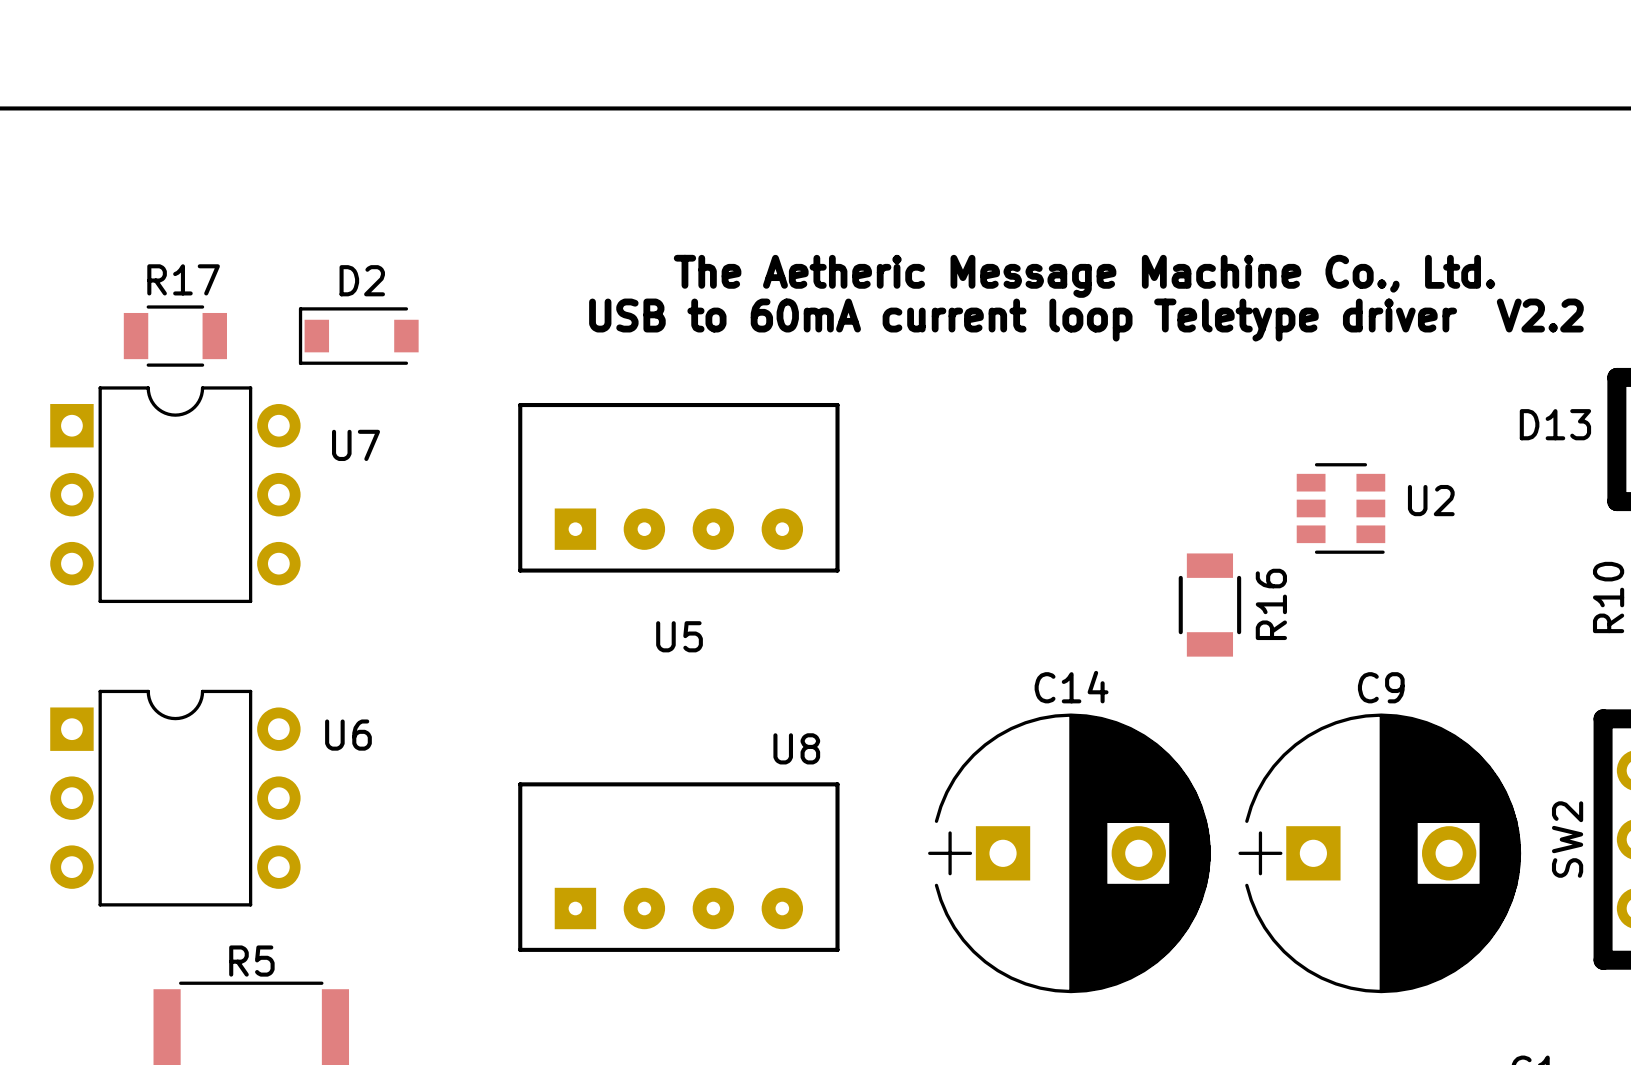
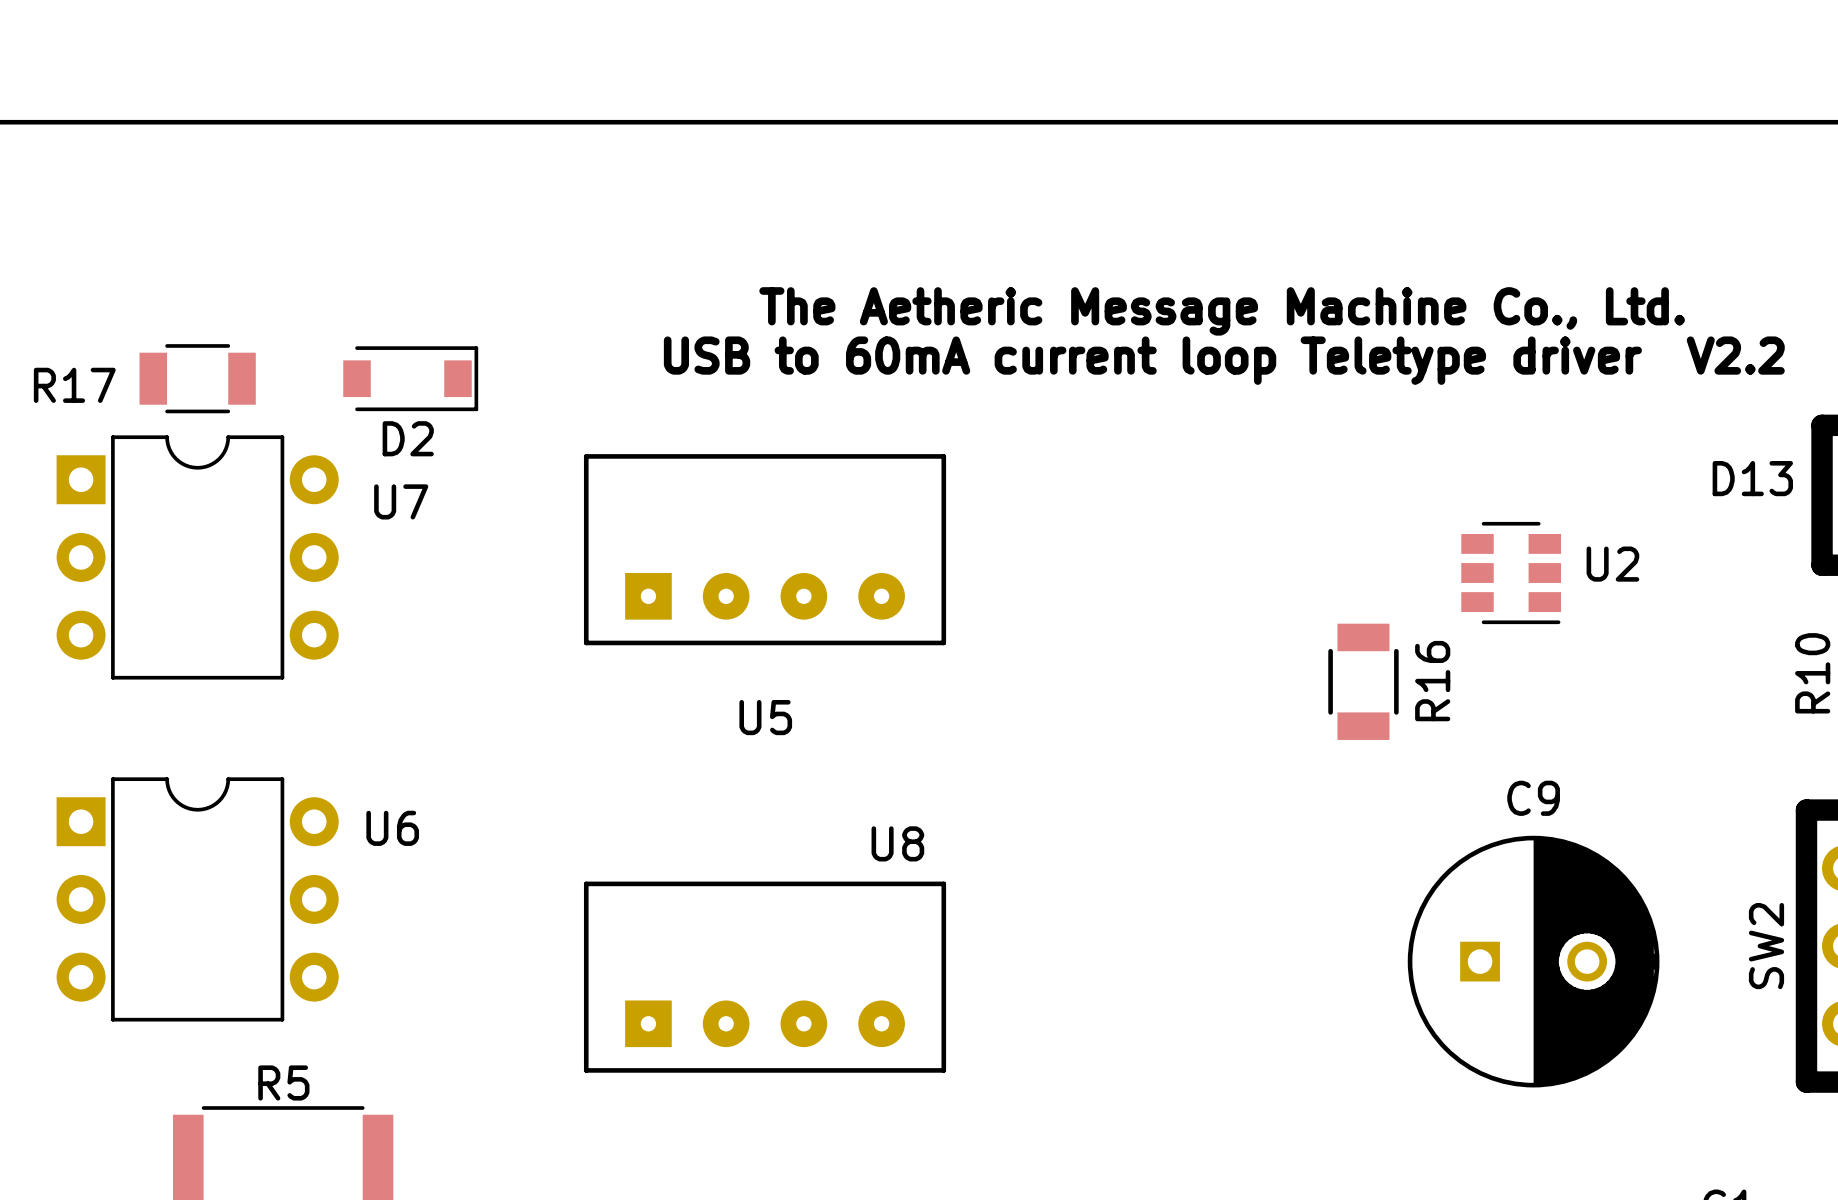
R17 name position: R17 (183, 279) -> R17 (74, 385)
D2 rotation: 0° (358, 336) -> 180° (410, 378)
C9 footprint: [1238, 713, 1522, 994] -> [1407, 835, 1660, 1088]
C14: (1069, 853) -> none

